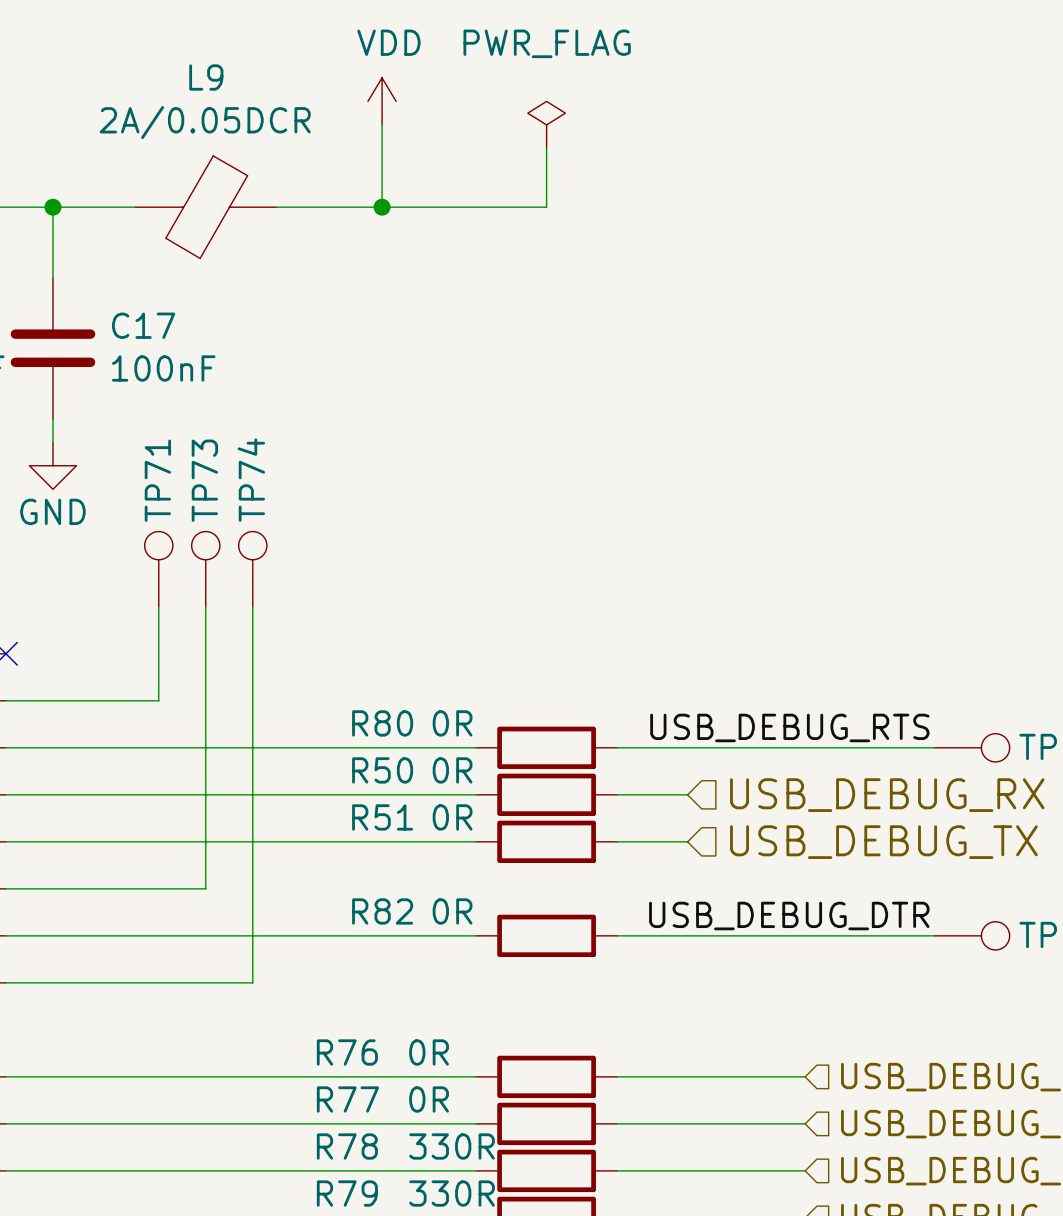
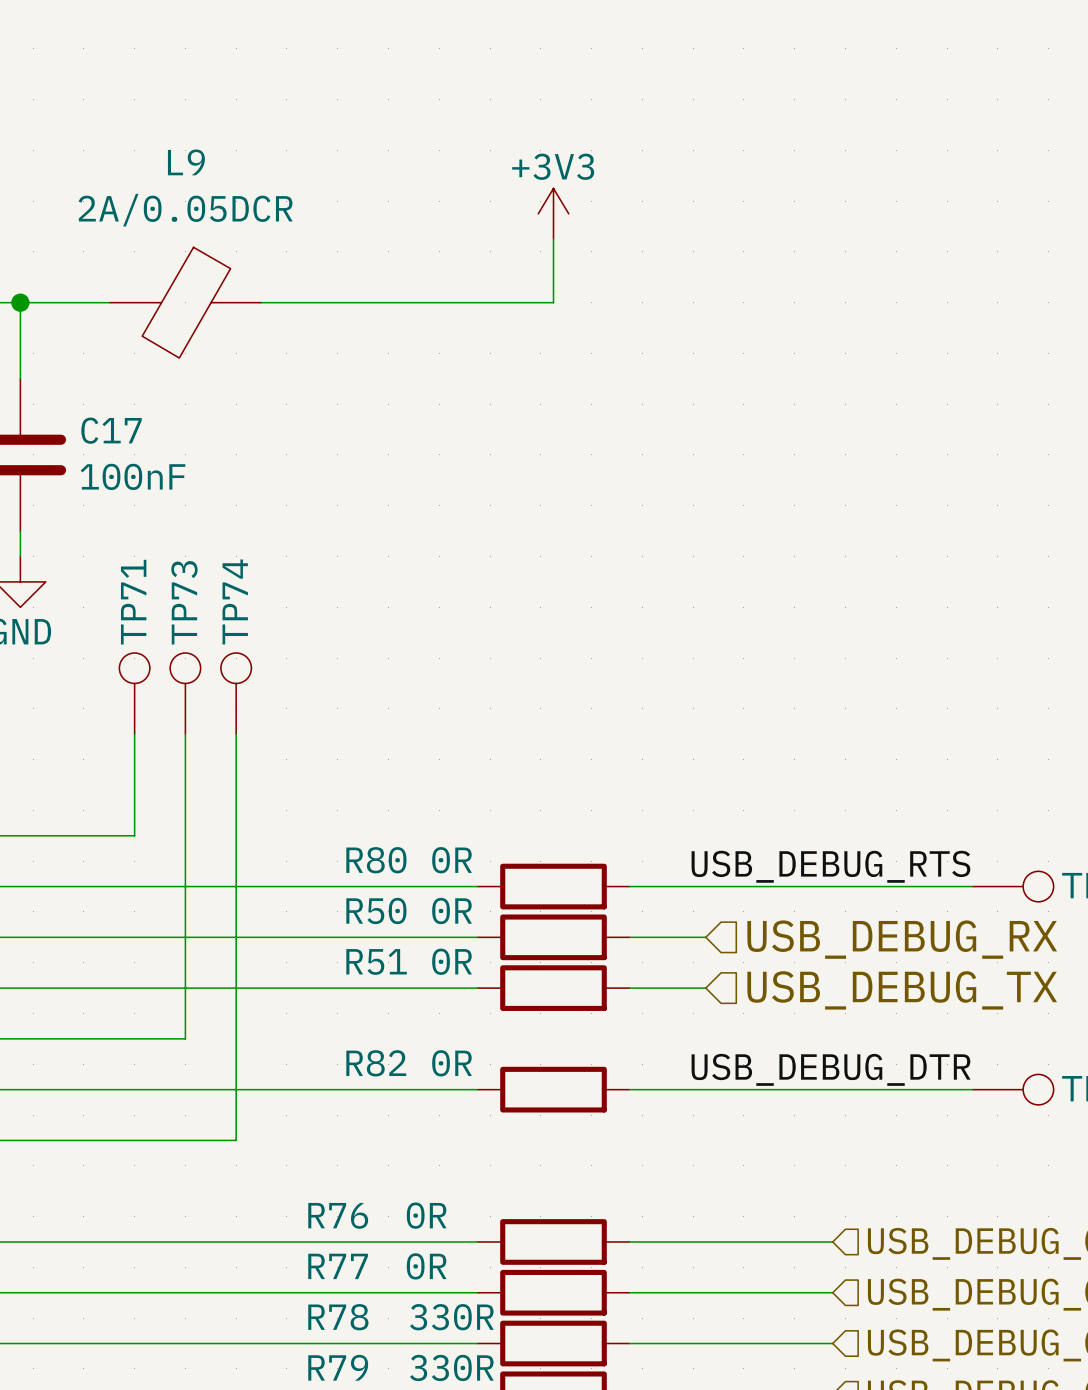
power symbol: VDD (382, 101) -> none
wire: (382, 124) (382, 207) -> none
power symbol: PWR_FLAG (546, 124) -> +3V3 (553, 213)
junction: (382, 207) -> none

